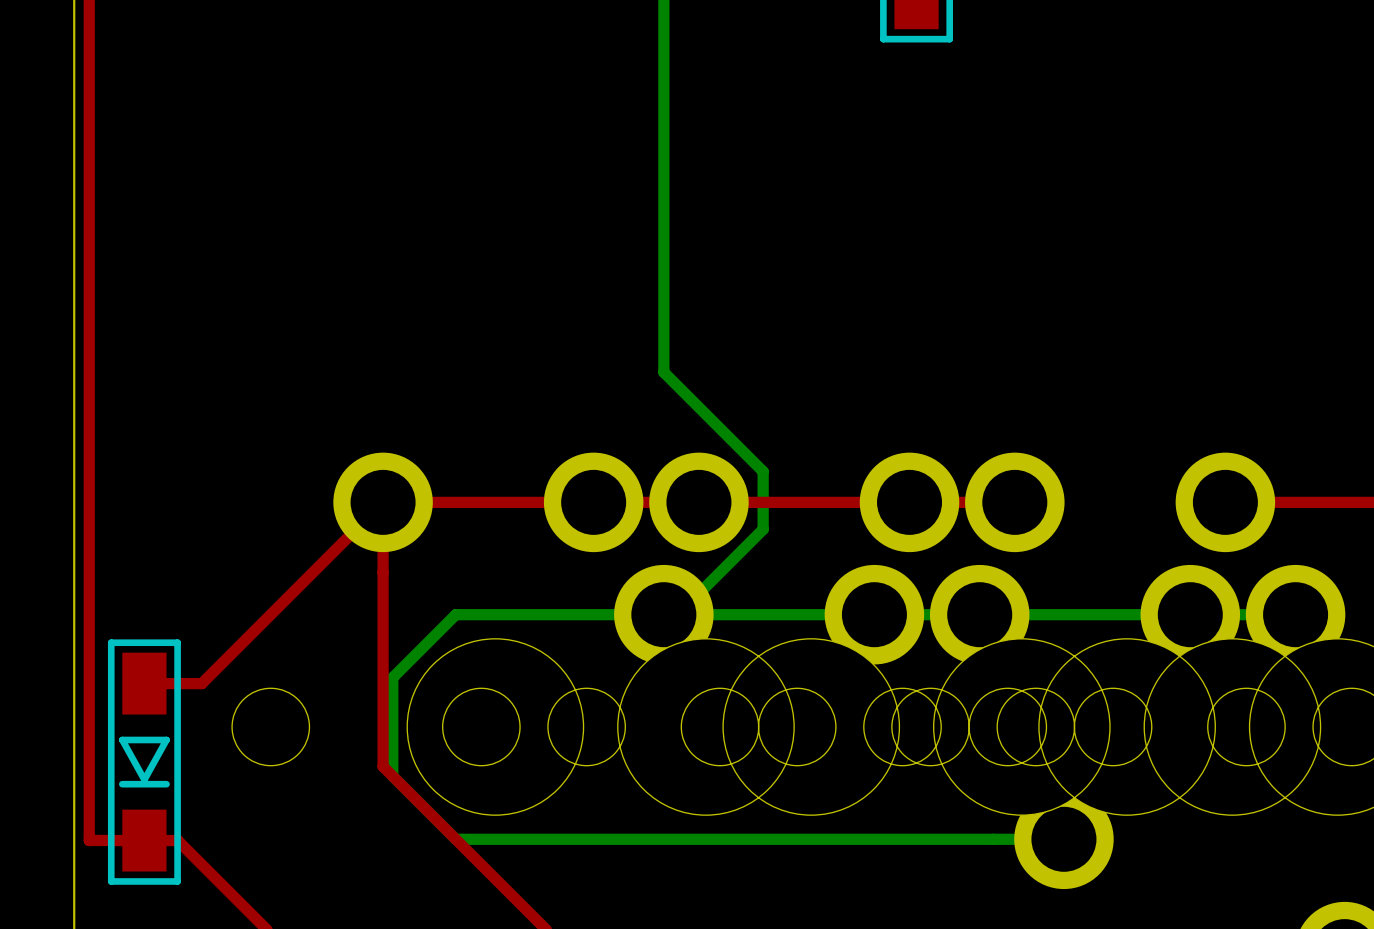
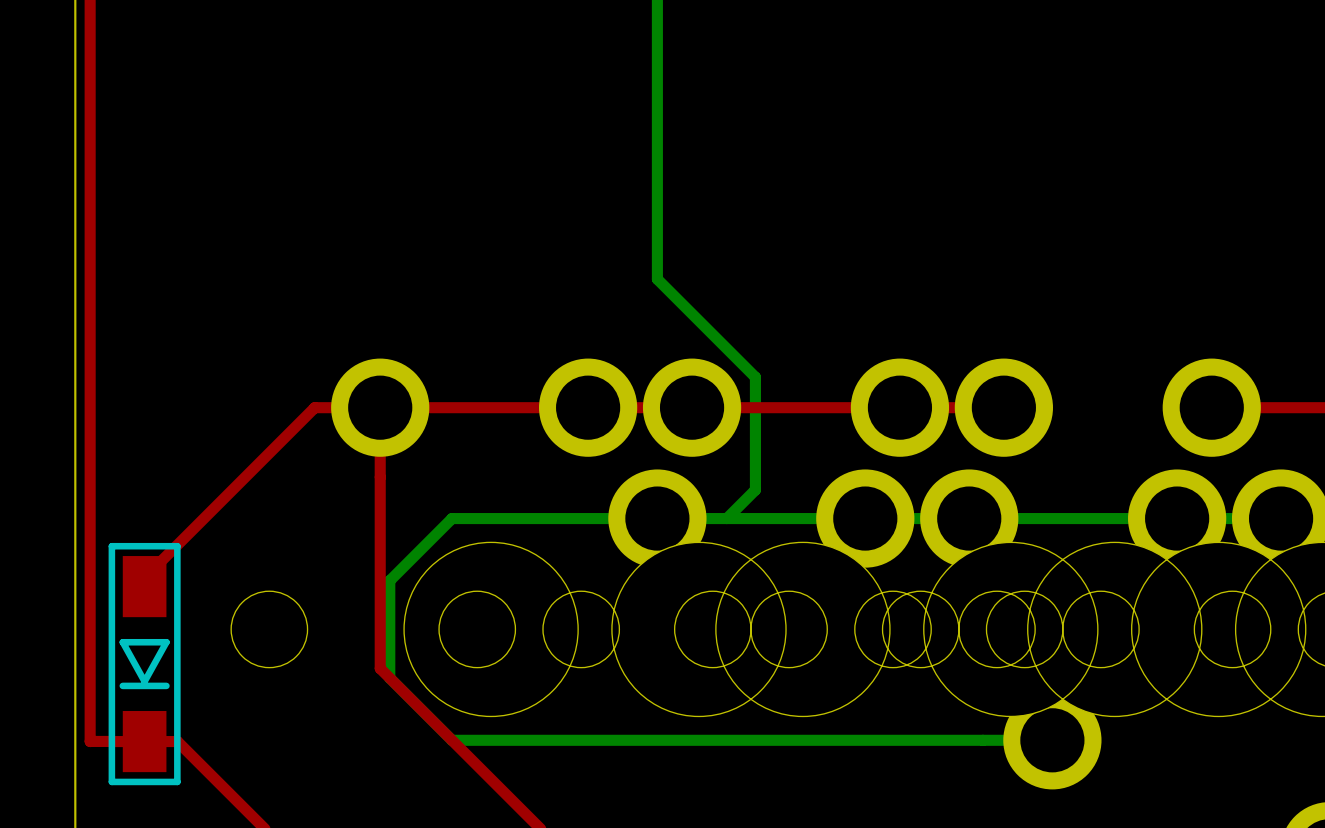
top track: (383, 502) (201, 683) (144, 683) -> (380, 407) (314, 407) (144, 577) (144, 586)
bottom track: (763, 529) (677, 614) -> (755, 434) (755, 489) (726, 518)

